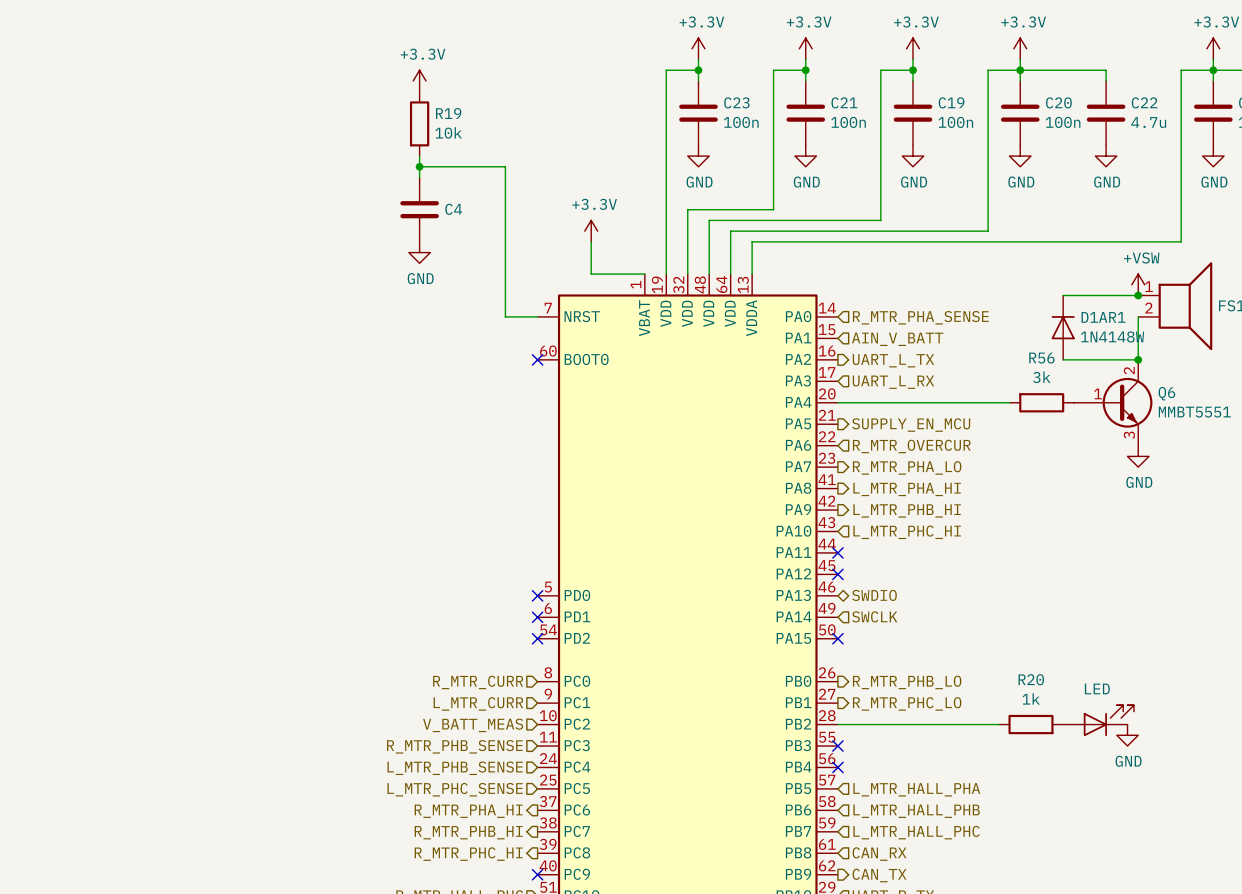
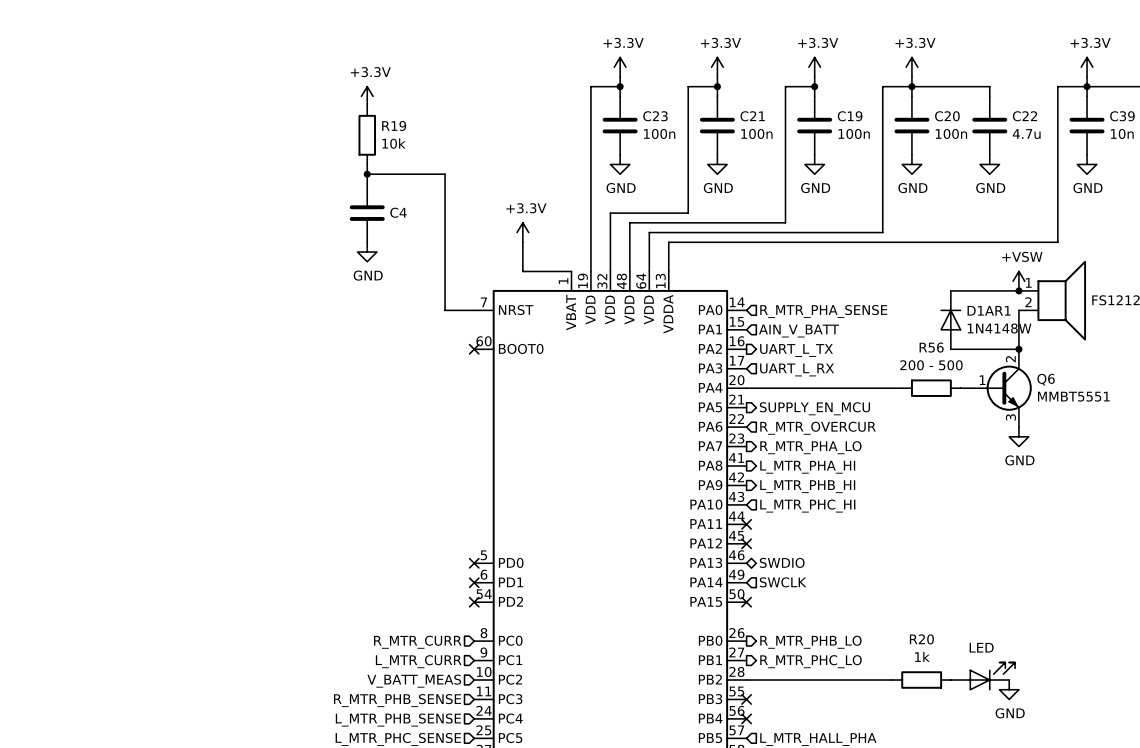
R56 value: 3k (1041, 377) -> 200 - 500 (931, 365)

